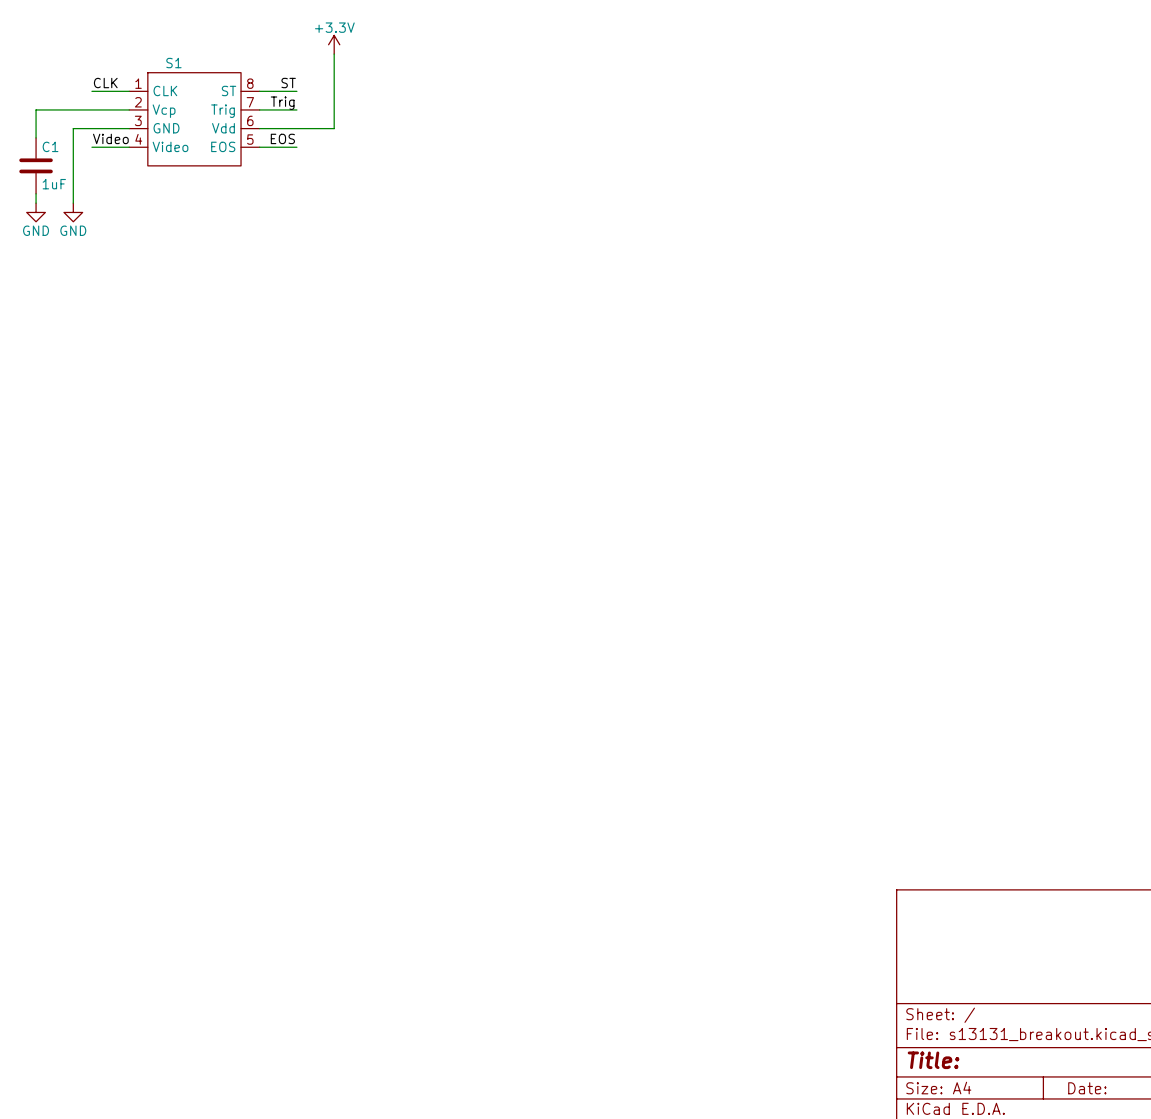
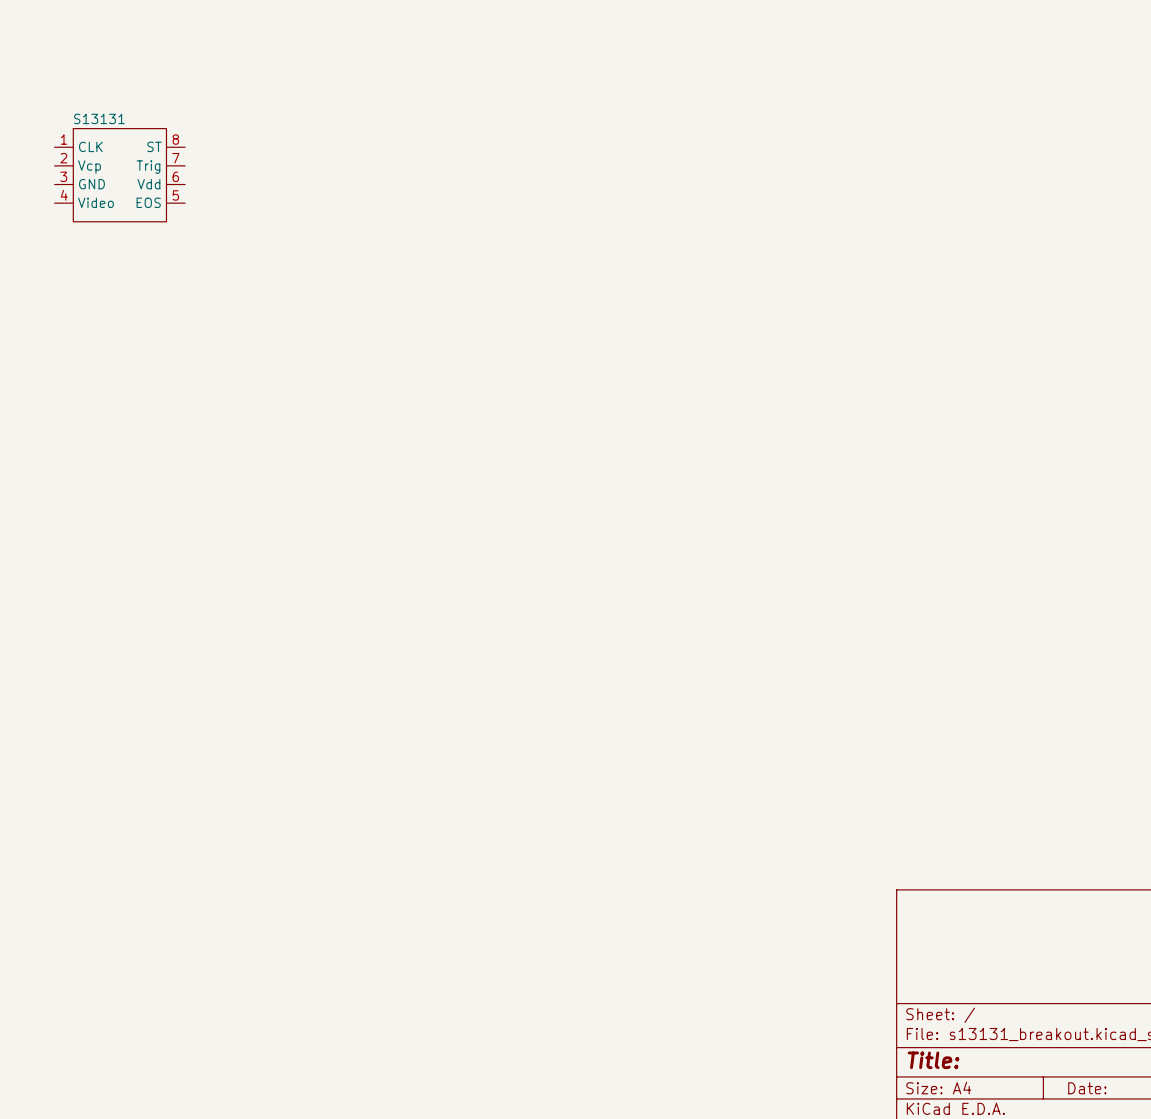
power symbol: +3.3V (334, 44) -> none
wire: (334, 54) (334, 128) (259, 128) -> none
label: CLK (105, 83) -> none
label: ST (288, 83) -> none
wire: (91, 91) (129, 91) -> none
wire: (259, 91) (296, 91) -> none
label: Trig (282, 103) -> none
wire: (129, 109) (36, 109) (36, 137) -> none
wire: (259, 109) (296, 109) -> none
S1: (194, 119) -> none
label: Video (110, 138) -> none
label: EOS (282, 138) -> none
wire: (91, 147) (129, 147) -> none
wire: (259, 147) (296, 147) -> none
C1: 1uF (36, 165) -> none
S13131: none -> (119, 175)
wire: (36, 193) (36, 203) -> none
power symbol: GND (36, 212) -> none
power symbol: GND (73, 212) -> none

